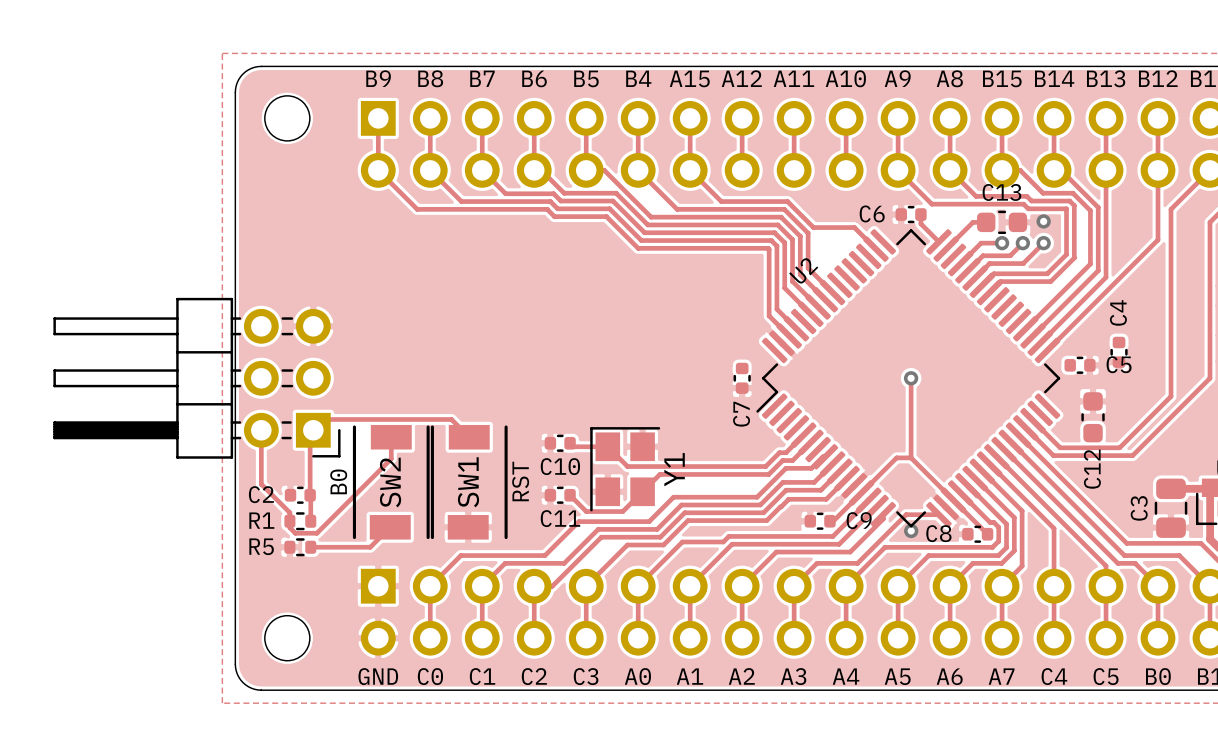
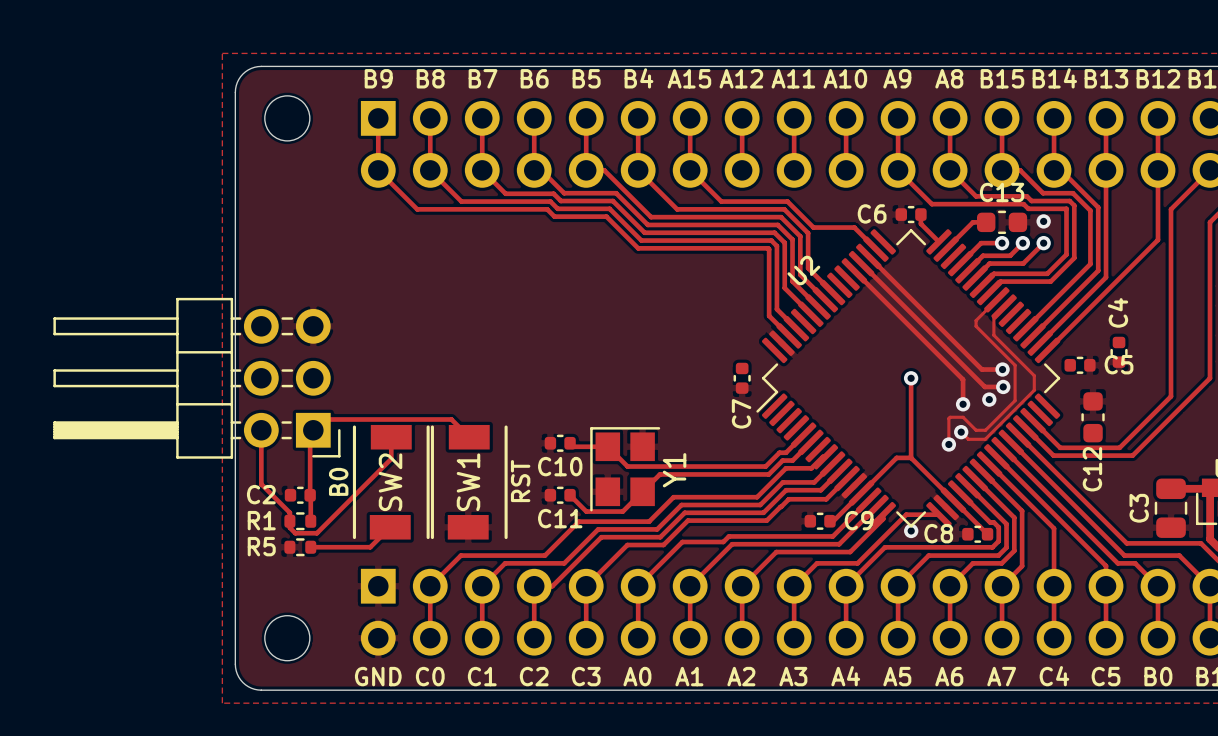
track: none -> (868, 256) (981, 369) (1002, 369)
track: none -> (861, 263) (984, 386) (1003, 386)
track: none -> (854, 270) (963, 379) (963, 404)
track: none -> (996, 299) (976, 320) (976, 326) (1015, 365) (1015, 400) (985, 430) (976, 430) (963, 417) (950, 417) (948, 444)
track: none -> (1004, 307) (993, 317) (993, 335) (1034, 375) (1034, 390) (985, 439) (968, 439) (961, 432)
via: none -> (1002, 369)
via: none -> (1003, 386)
via: none -> (989, 399)
via: none -> (963, 404)
via: none -> (961, 432)
via: none -> (948, 444)

